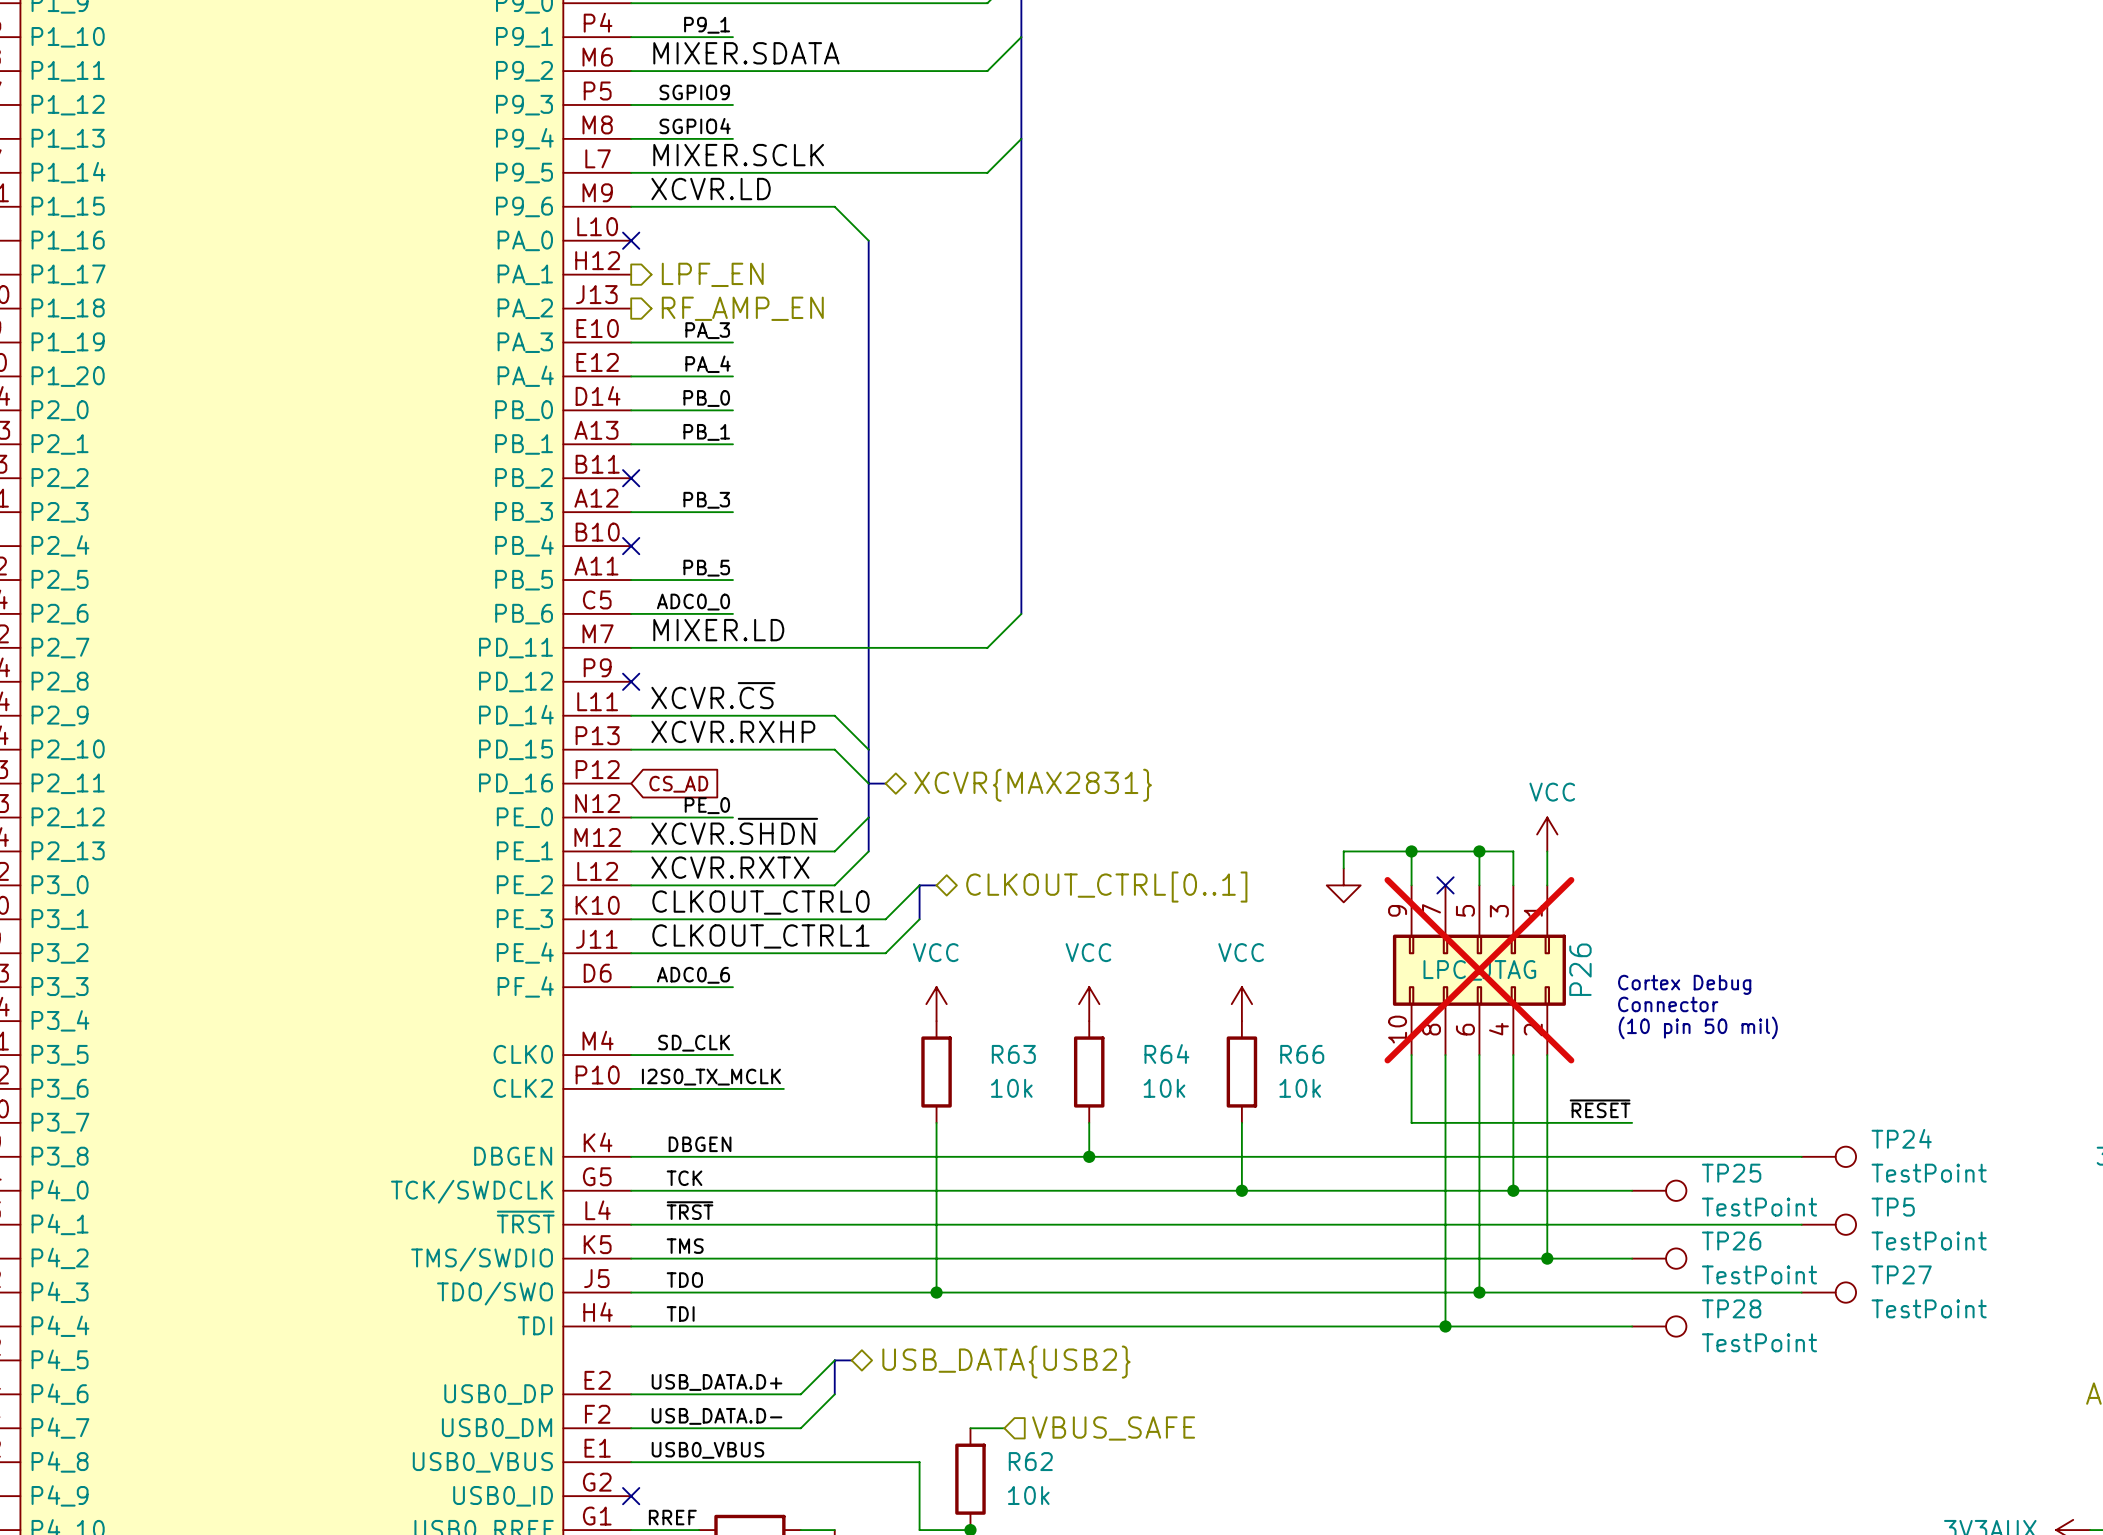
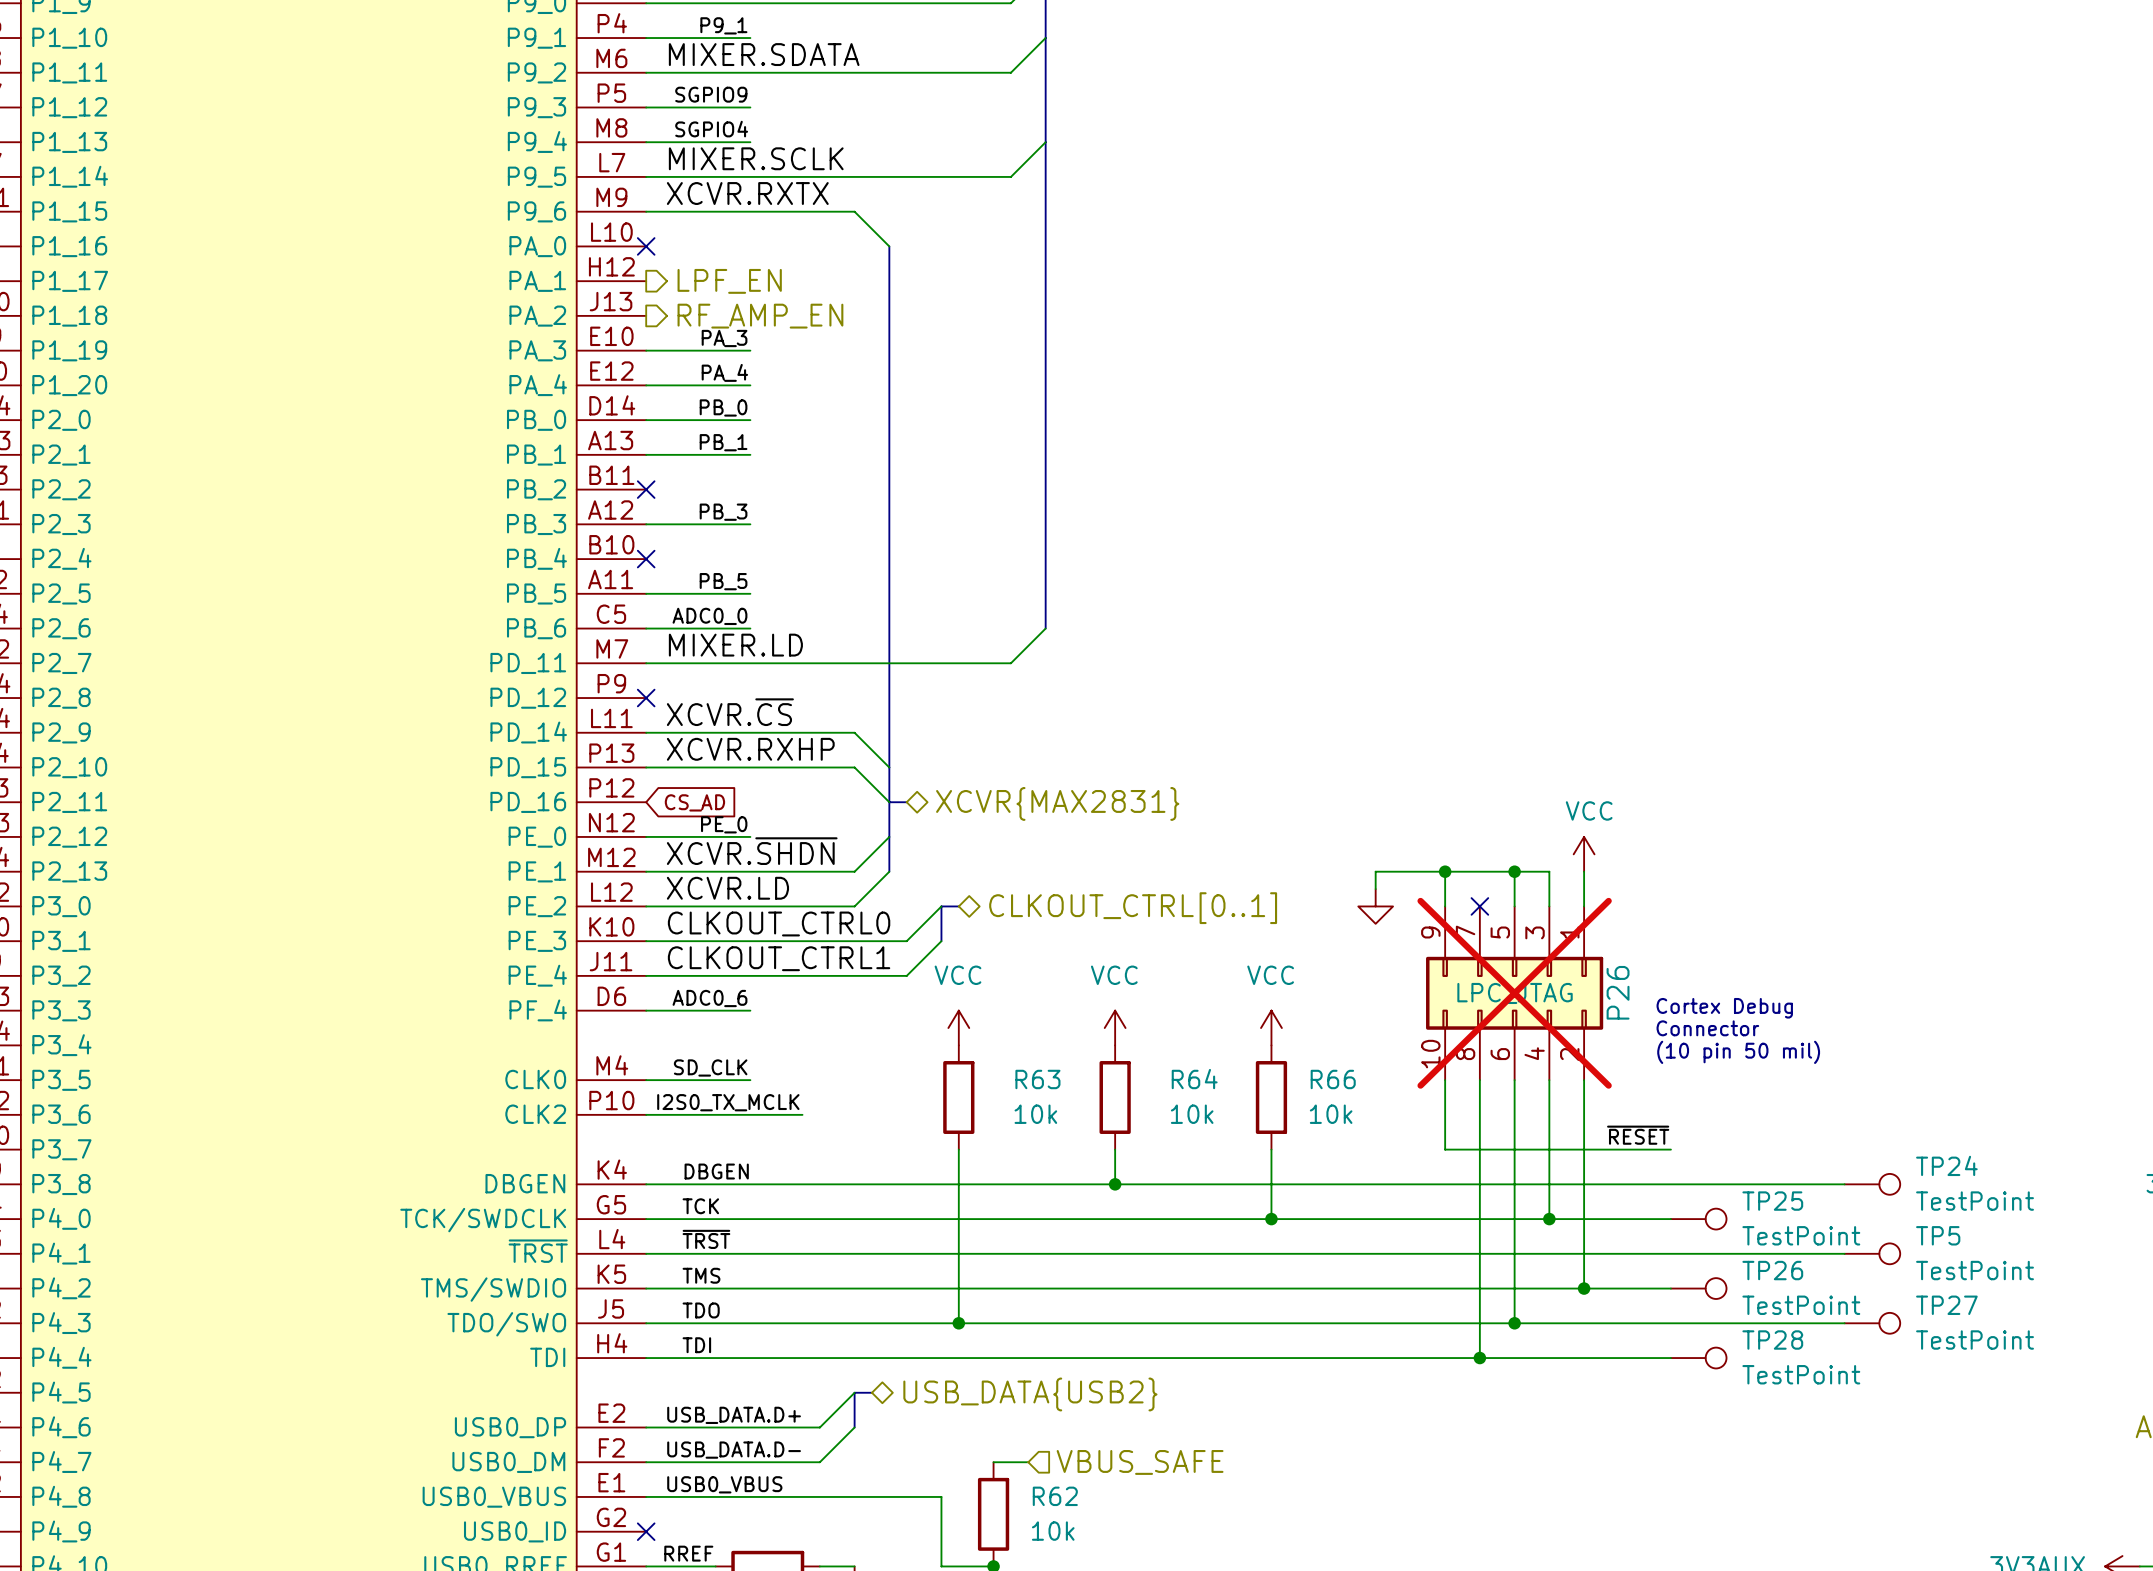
label: XCVR.LD (711, 189) -> XCVR.RXTX (747, 193)
label: XCVR.RXTX (730, 867) -> XCVR.LD (727, 888)

